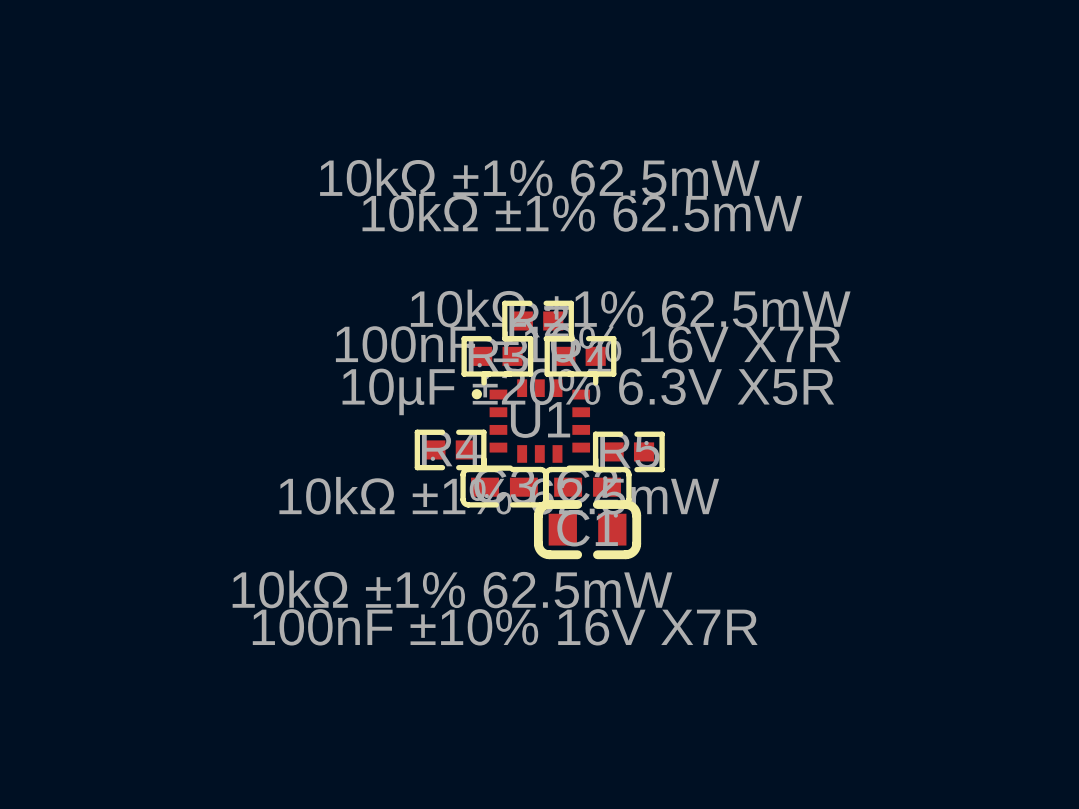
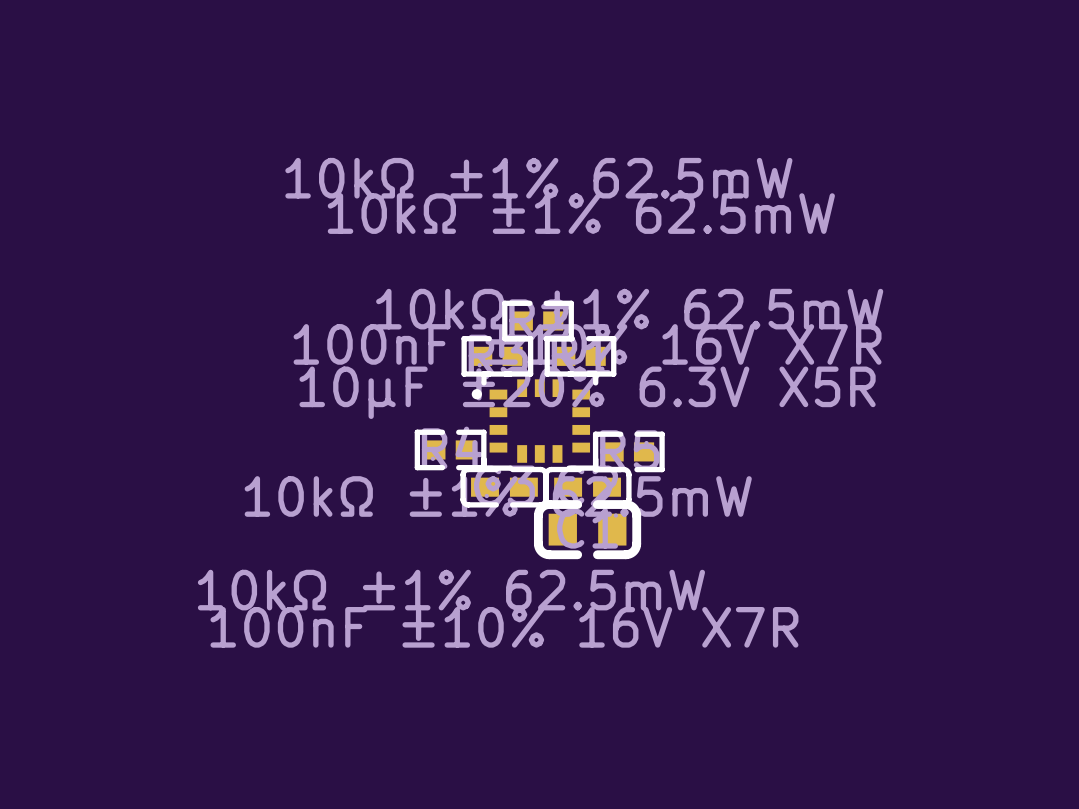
U1 name: U1 (540, 420) -> none

